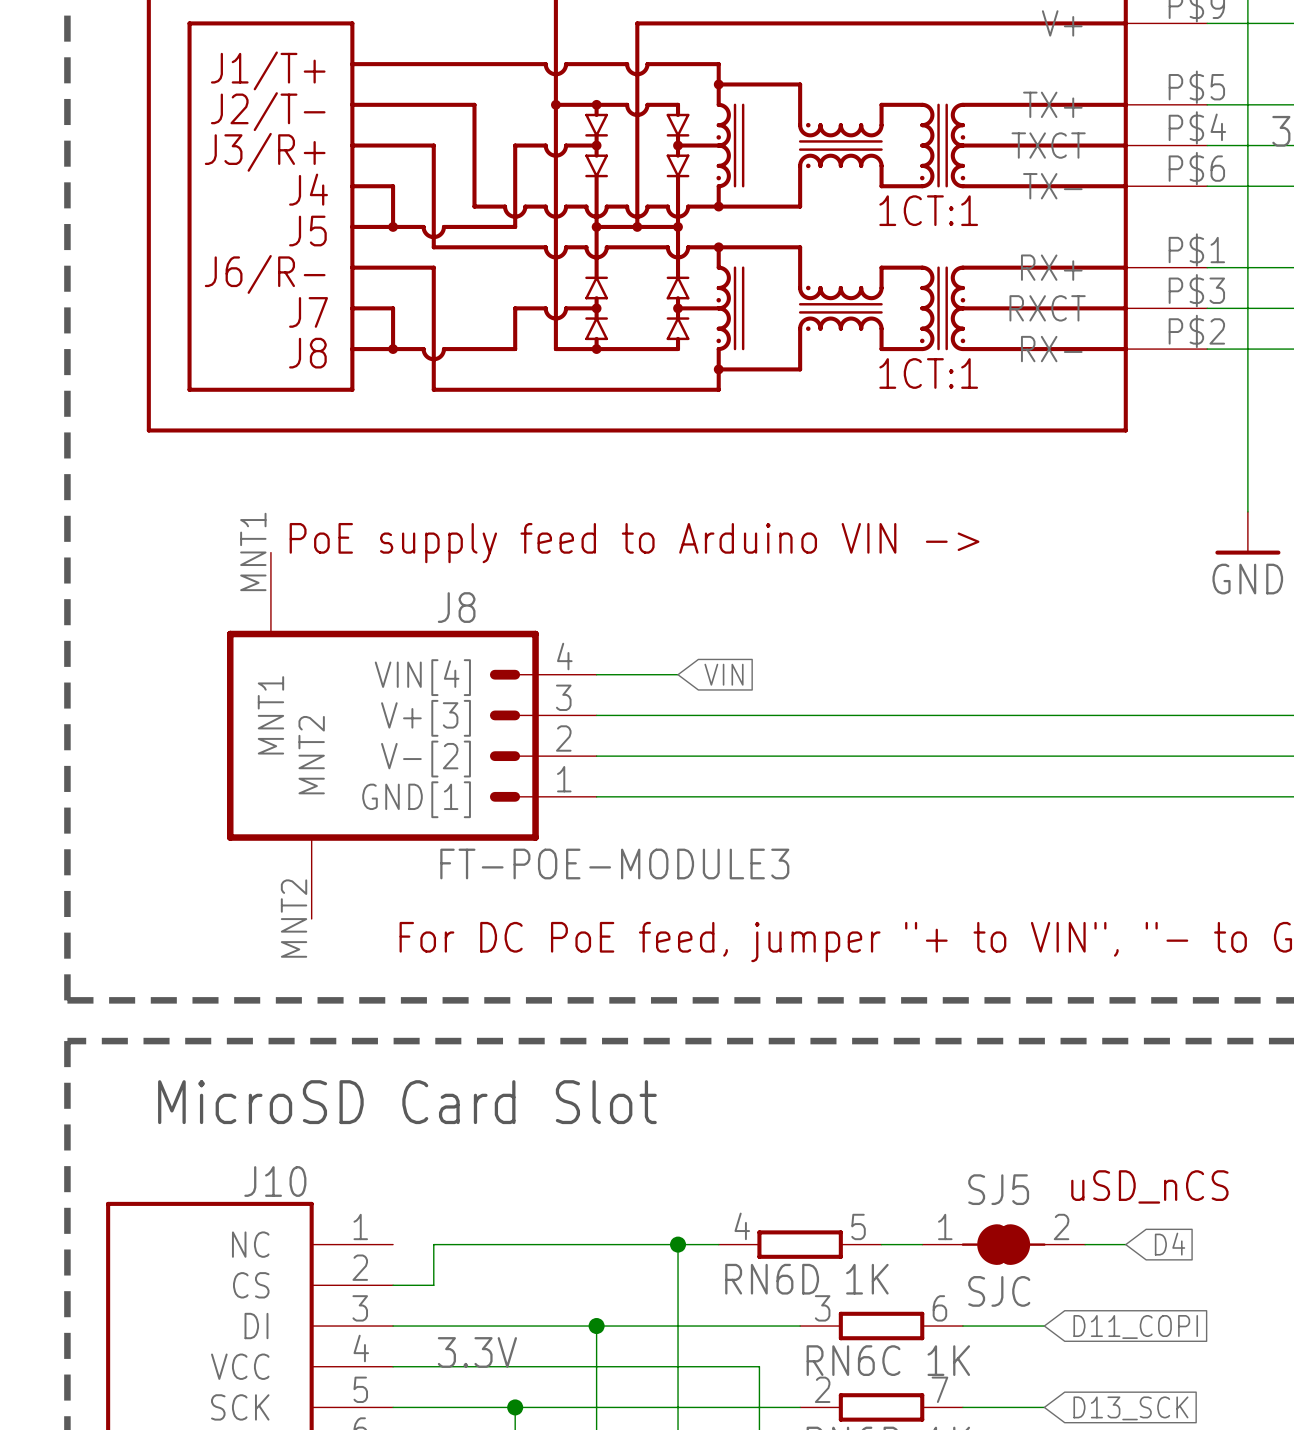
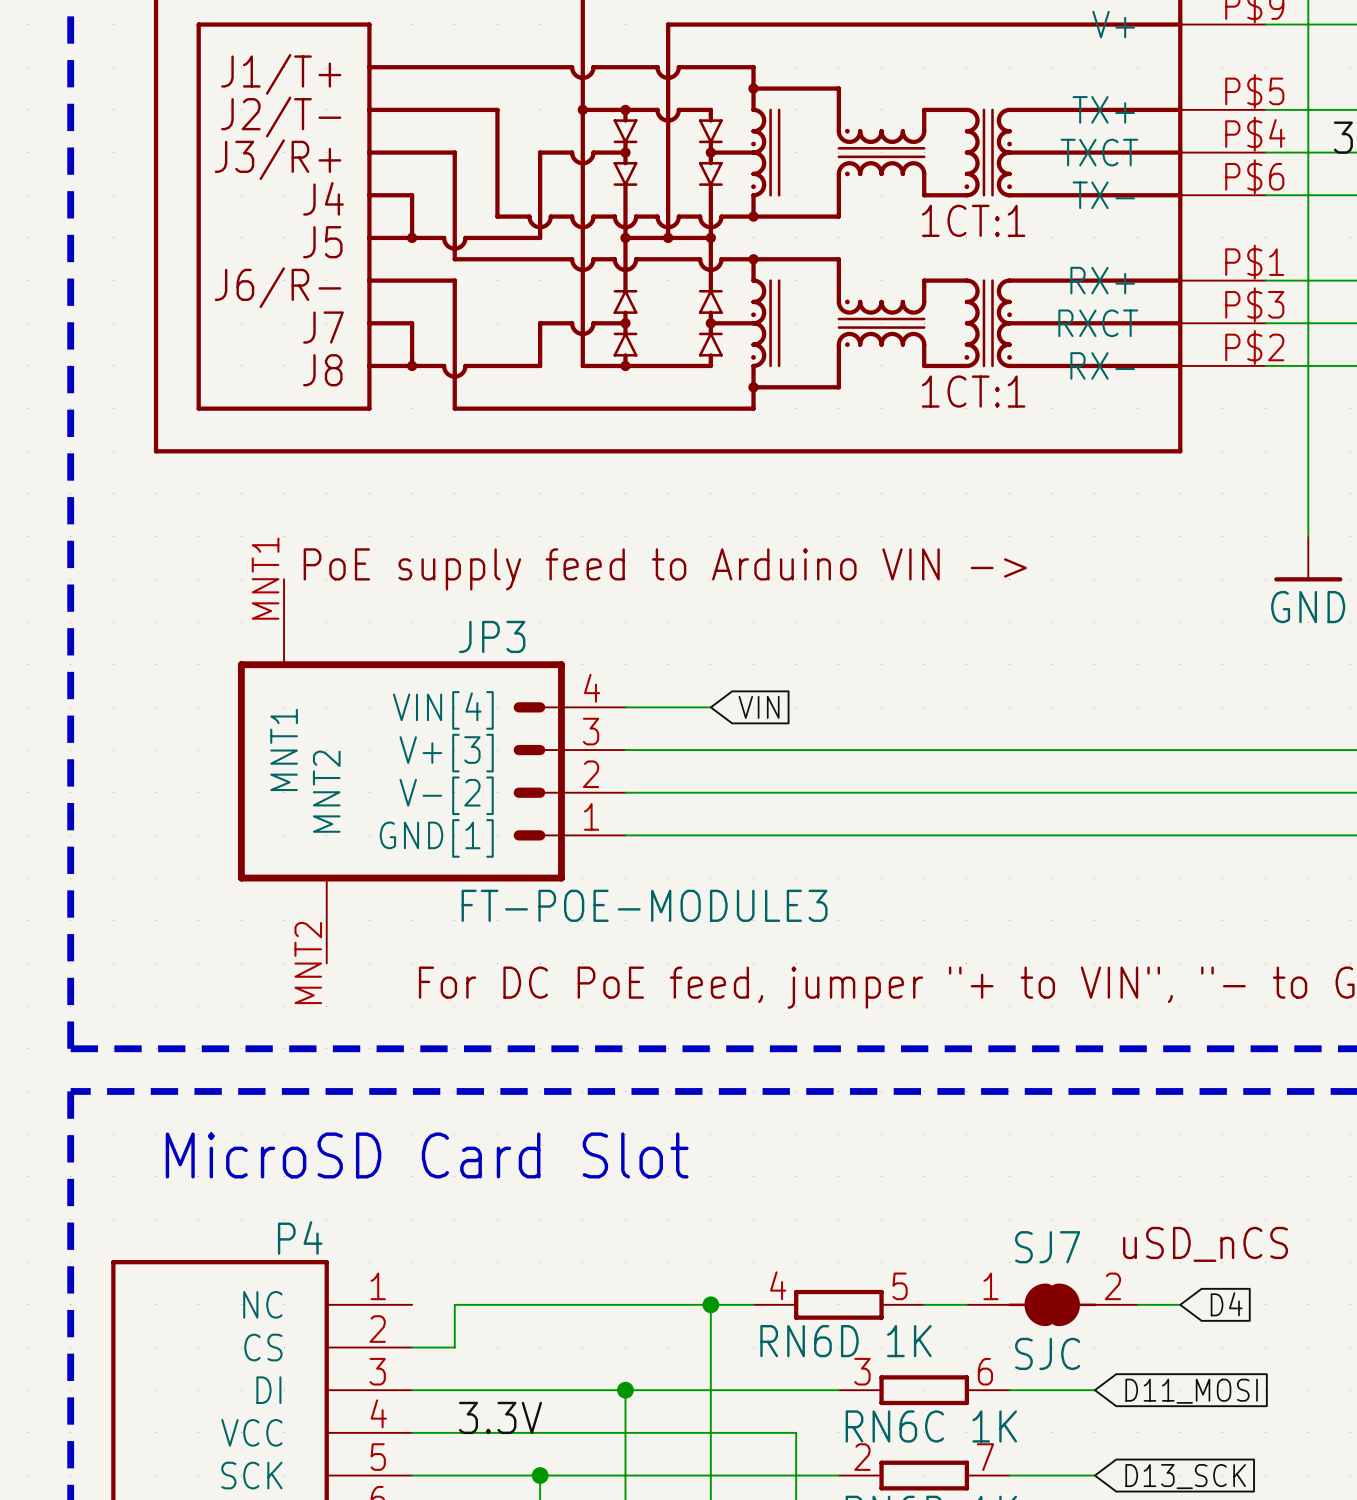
J8 name: J8 (456, 607) -> JP3 (492, 636)
J10 name: J10 (275, 1181) -> P4 (300, 1237)
SJ5 name: SJ5 (998, 1189) -> SJ7 (1047, 1247)
global label: D11_COPI (1135, 1326) -> D11_MOSI (1191, 1391)

